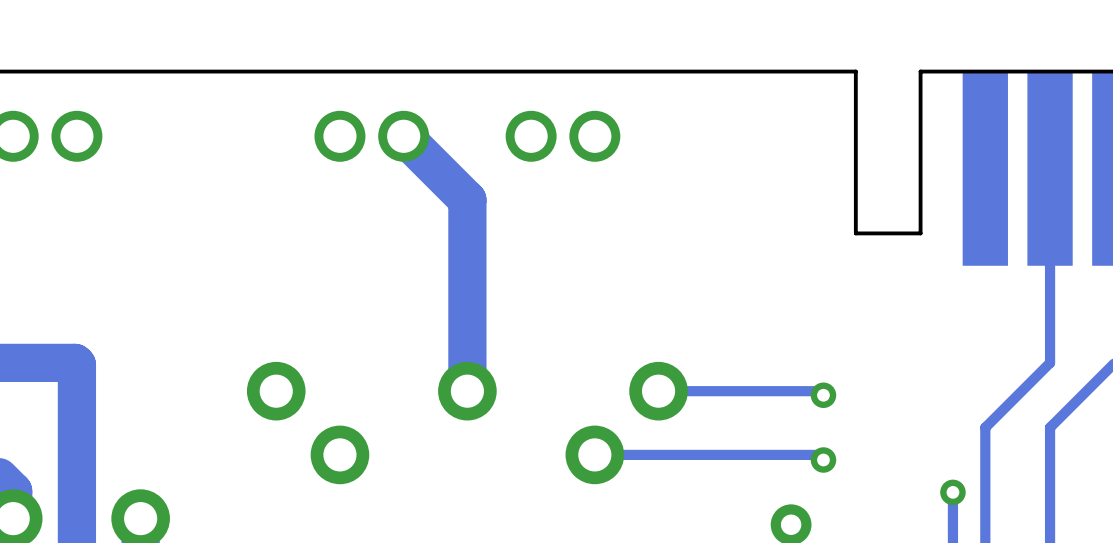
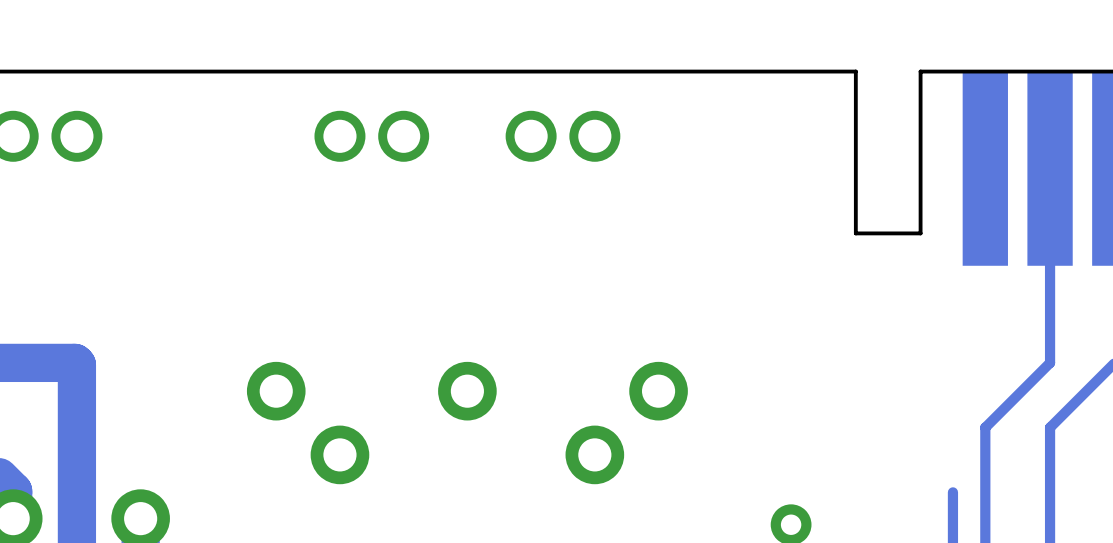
track: (403, 136) (467, 200) (467, 391) -> none
track: (658, 391) (819, 391) (823, 395) -> none
via: (823, 395) -> none
track: (594, 454) (818, 454) (823, 460) -> none
via: (823, 460) -> none
via: (952, 492) -> none

